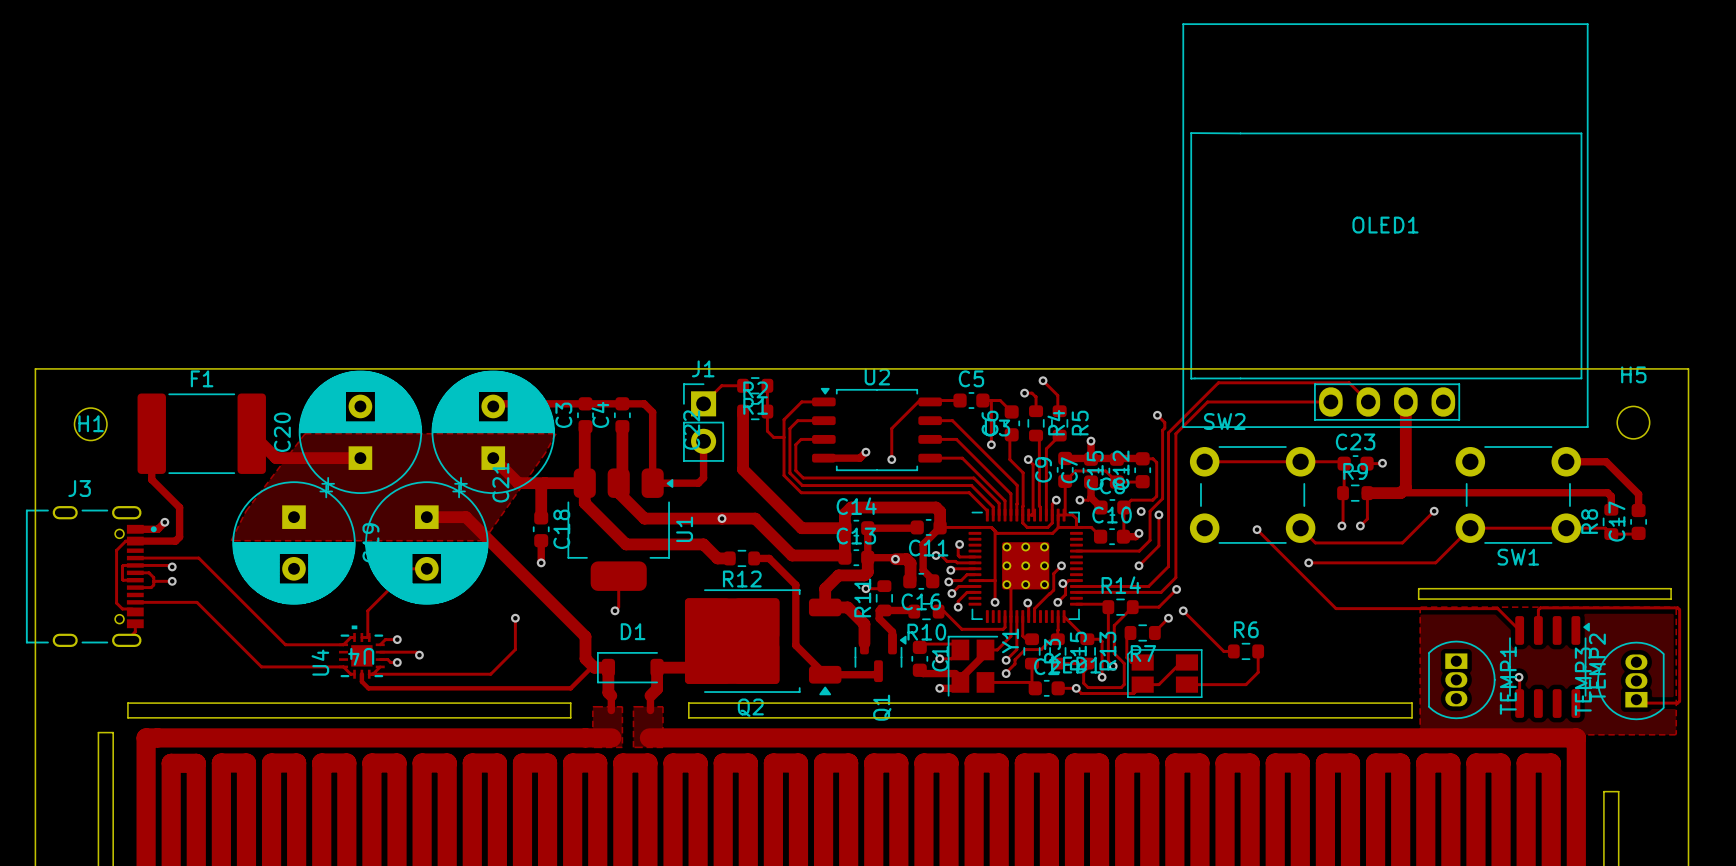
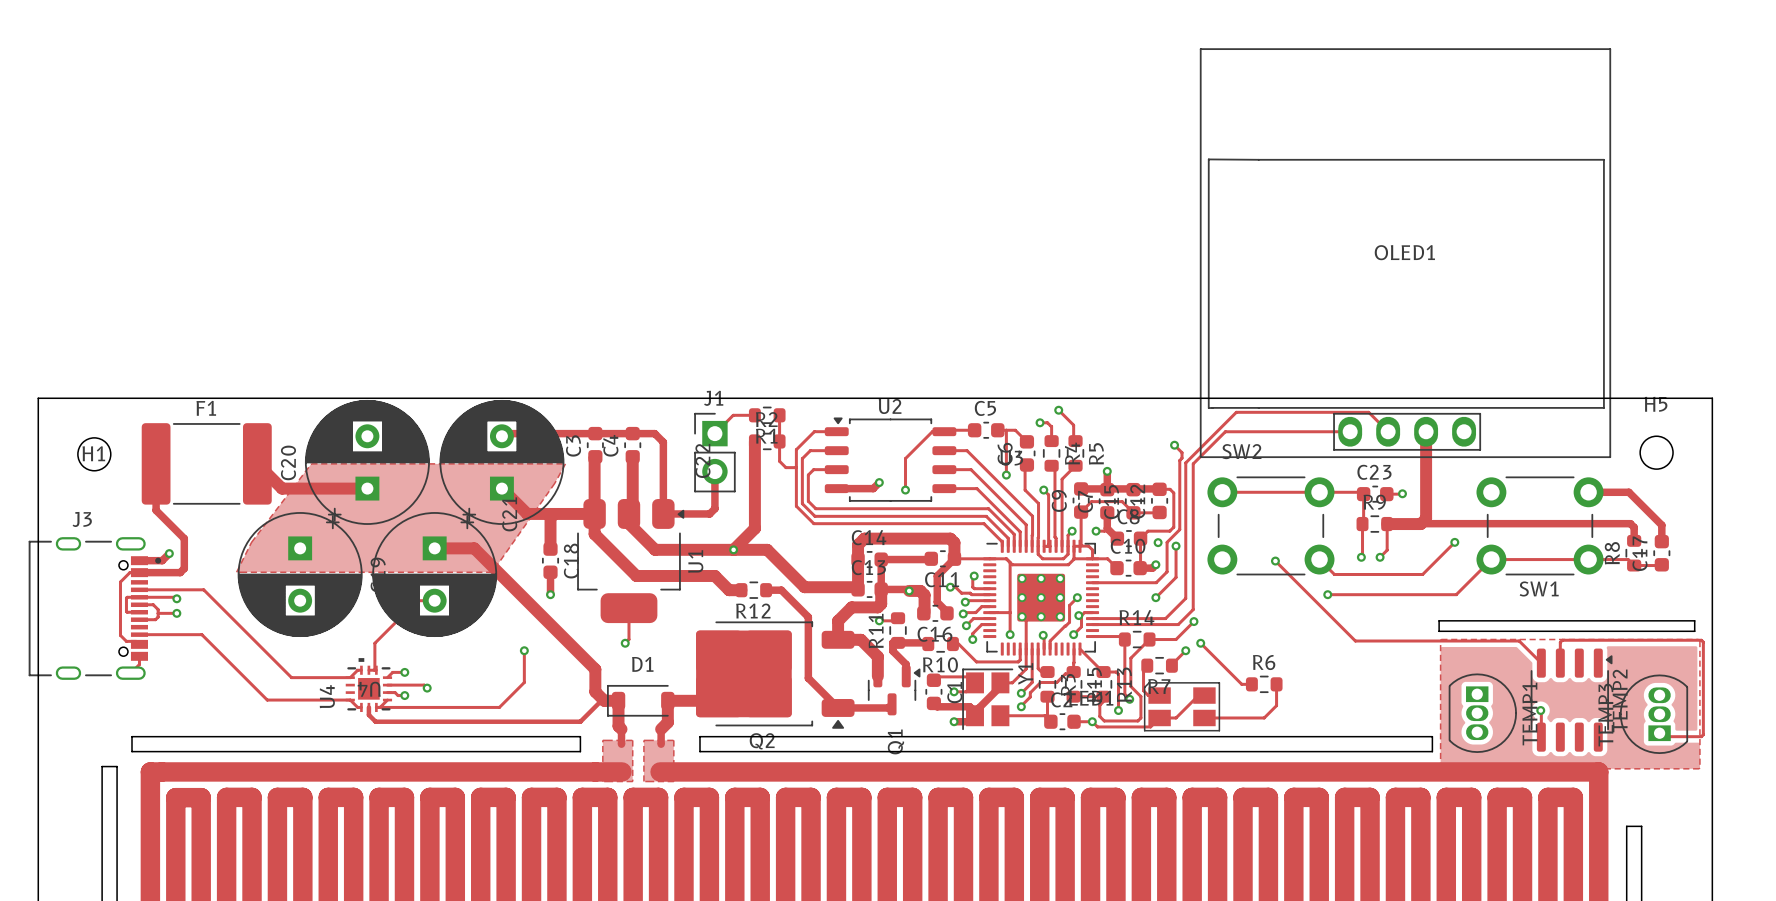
track: (743, 469) (801, 528) (844, 528) -> (754, 500) (754, 528) (733, 549)

